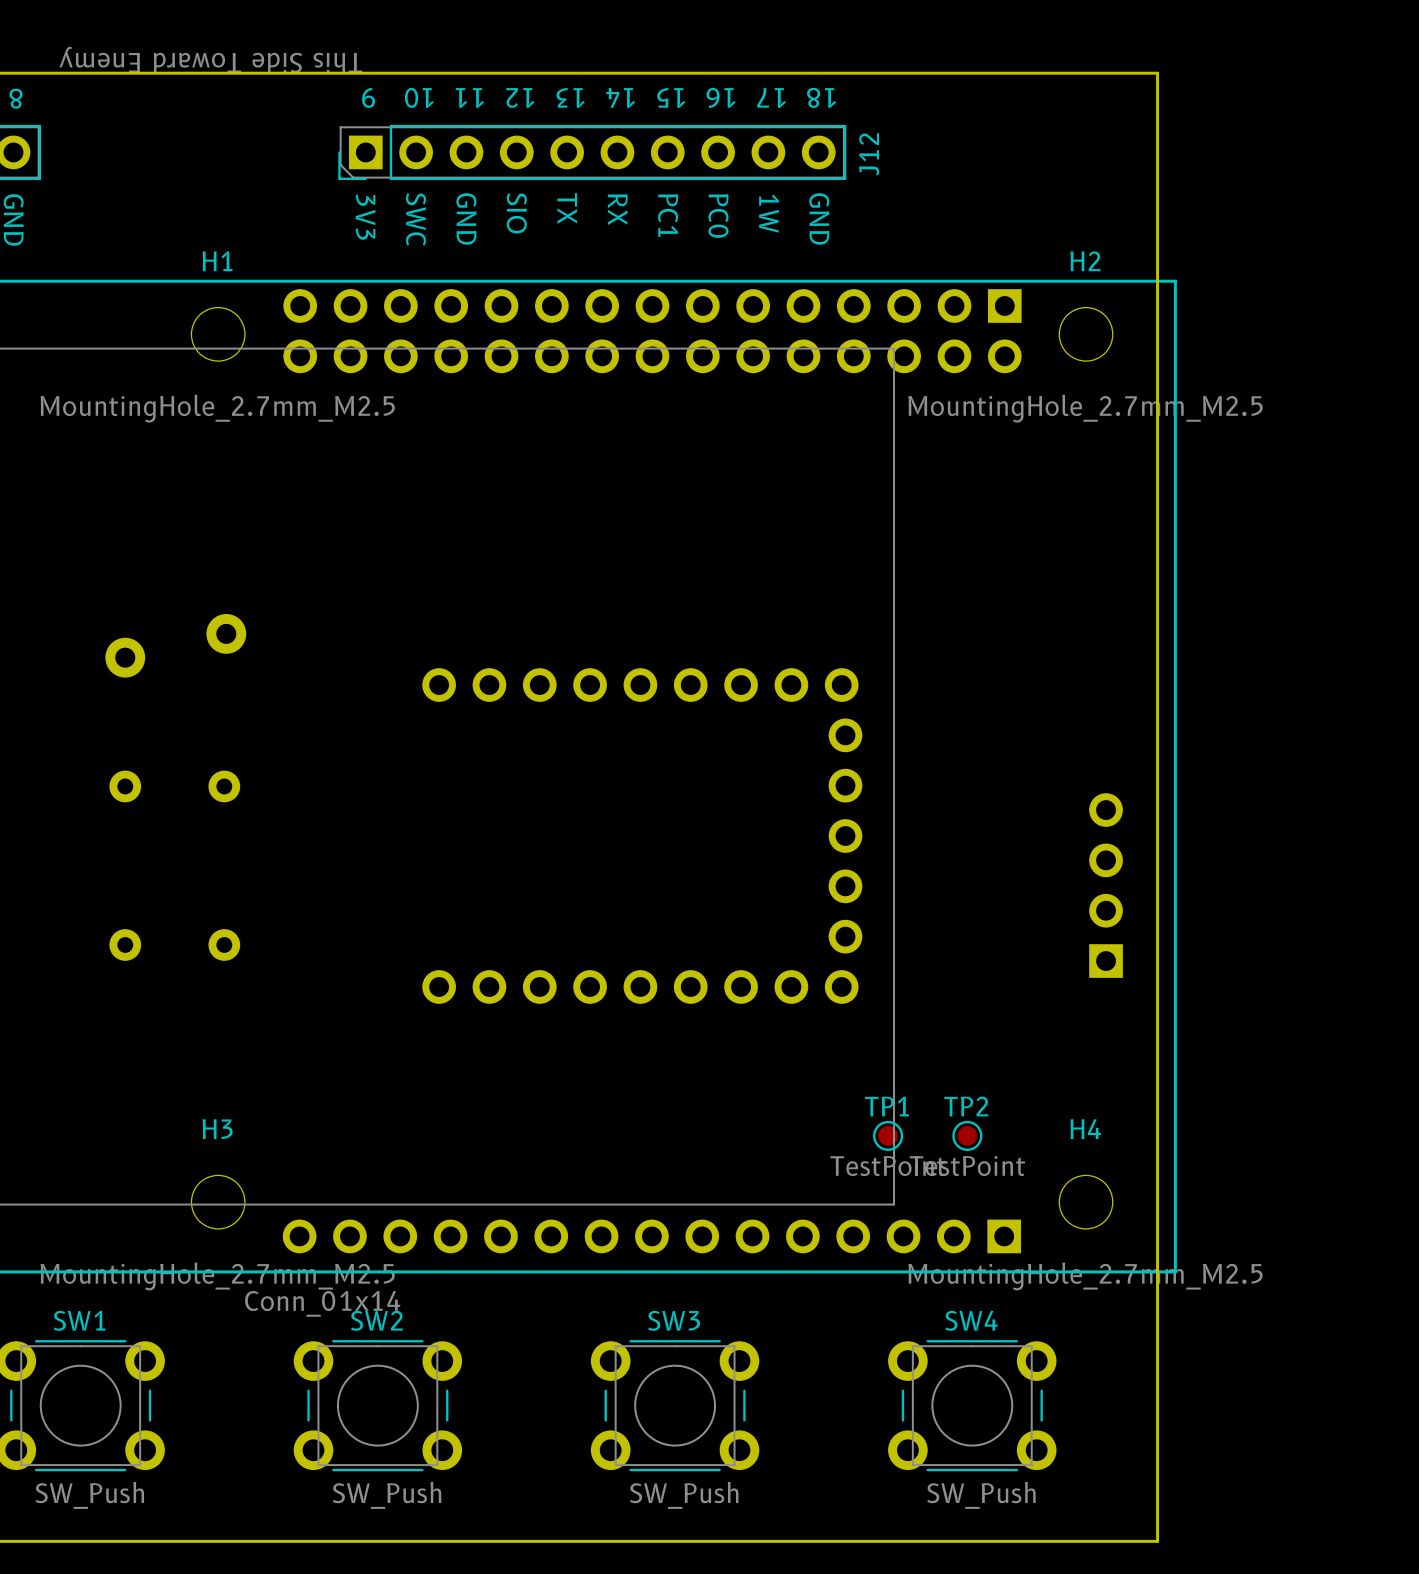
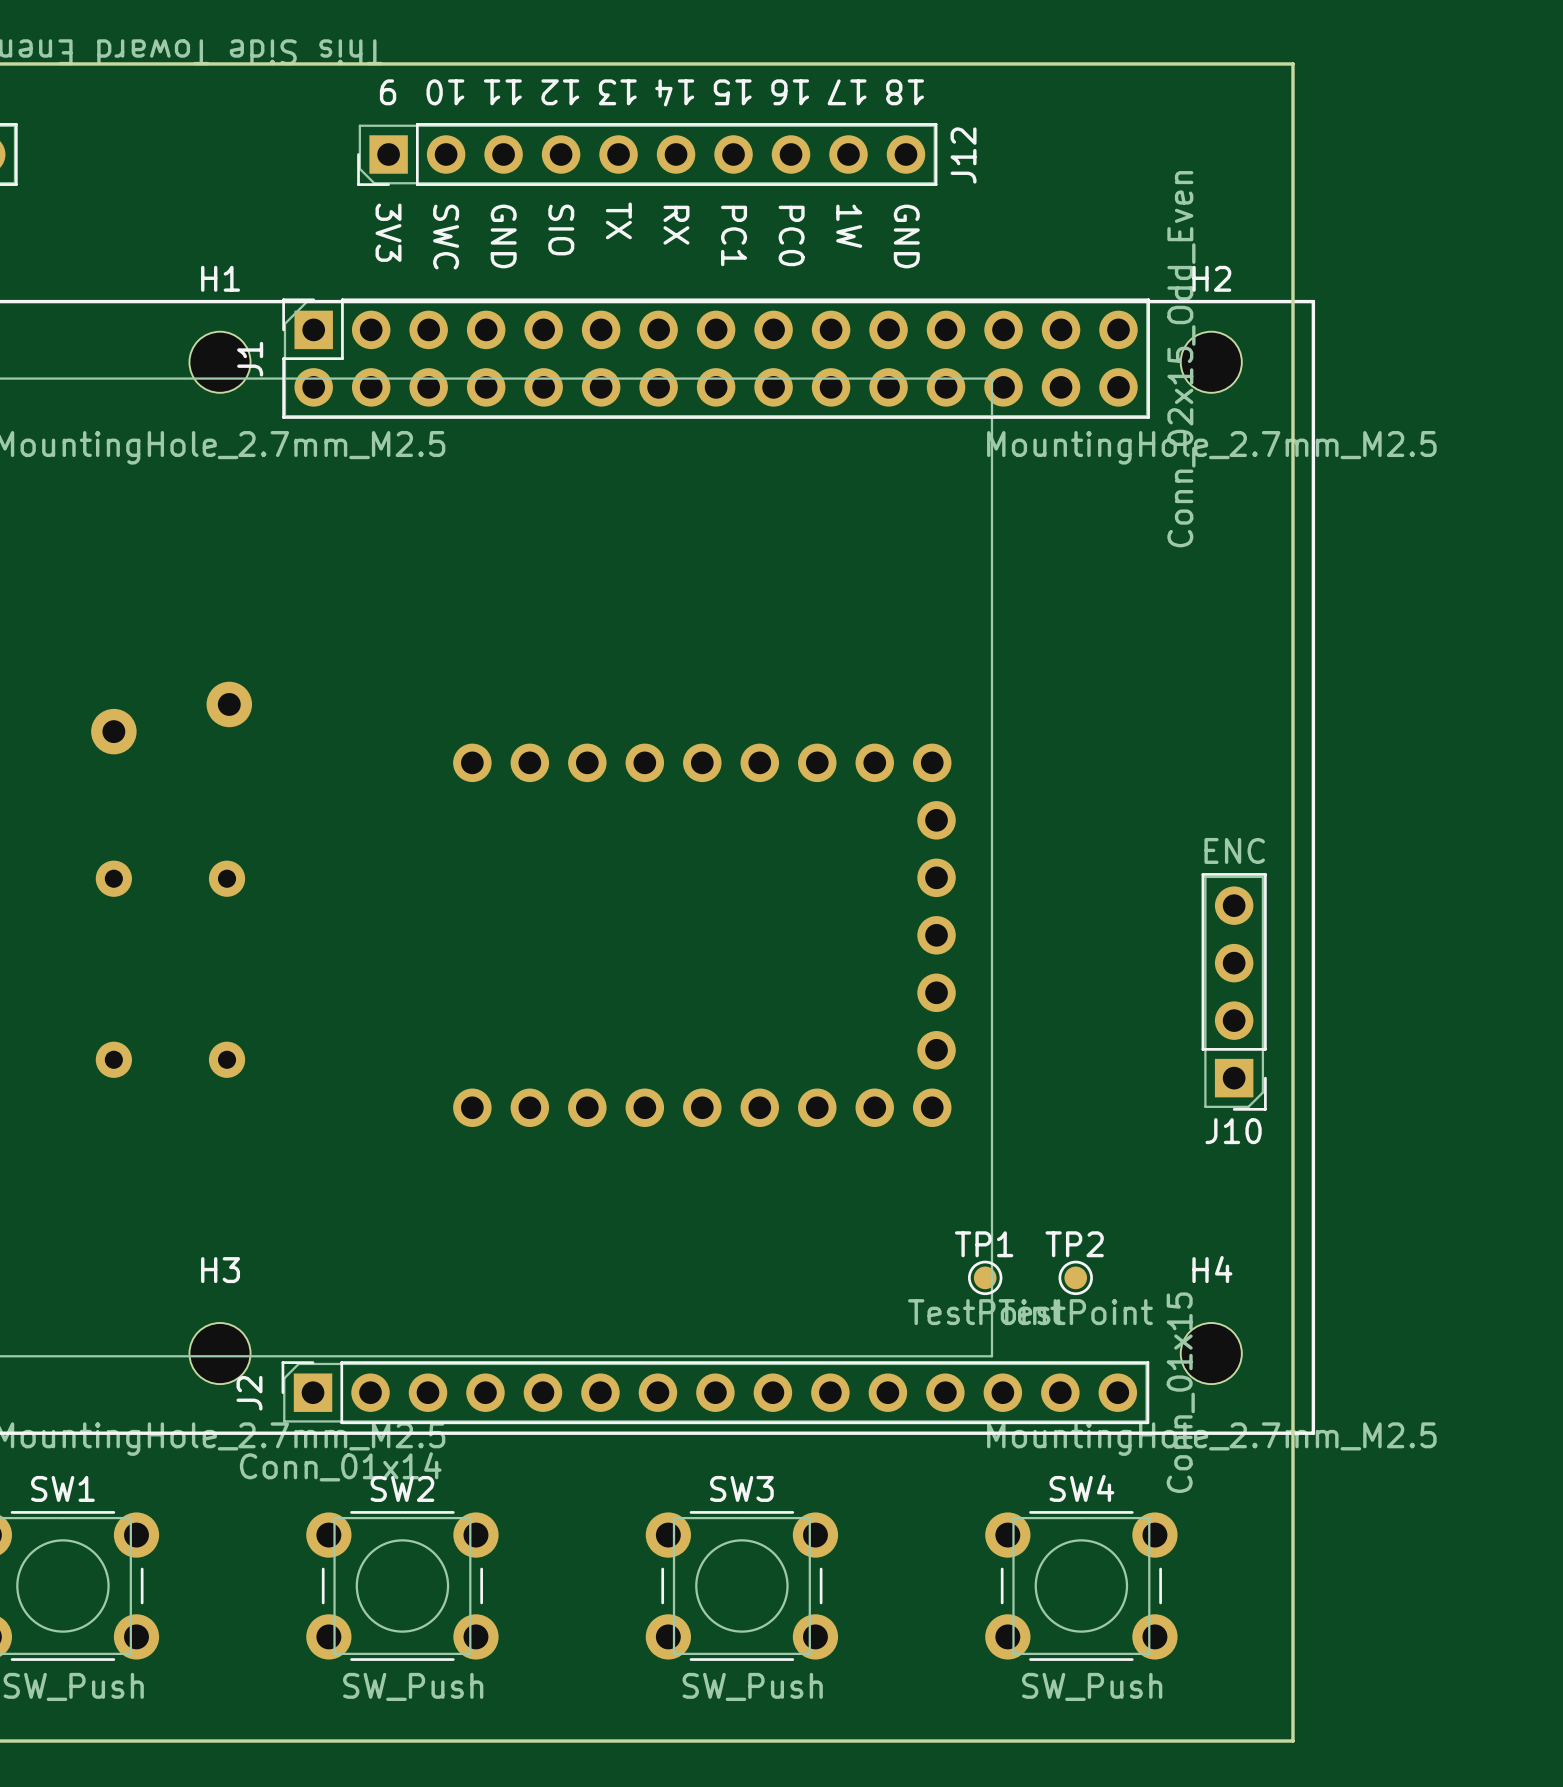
J1 side: bottom (652, 331) -> top (716, 358)
J10 side: bottom (1106, 885) -> top (1234, 991)
J2 side: bottom (651, 1236) -> top (715, 1392)

